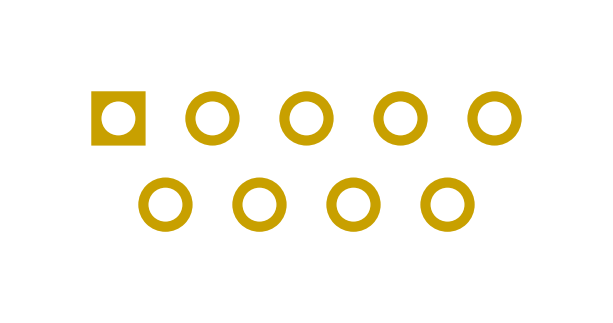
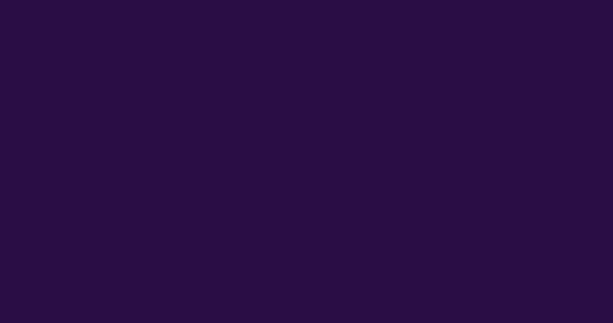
part: (306, 161) -> none

